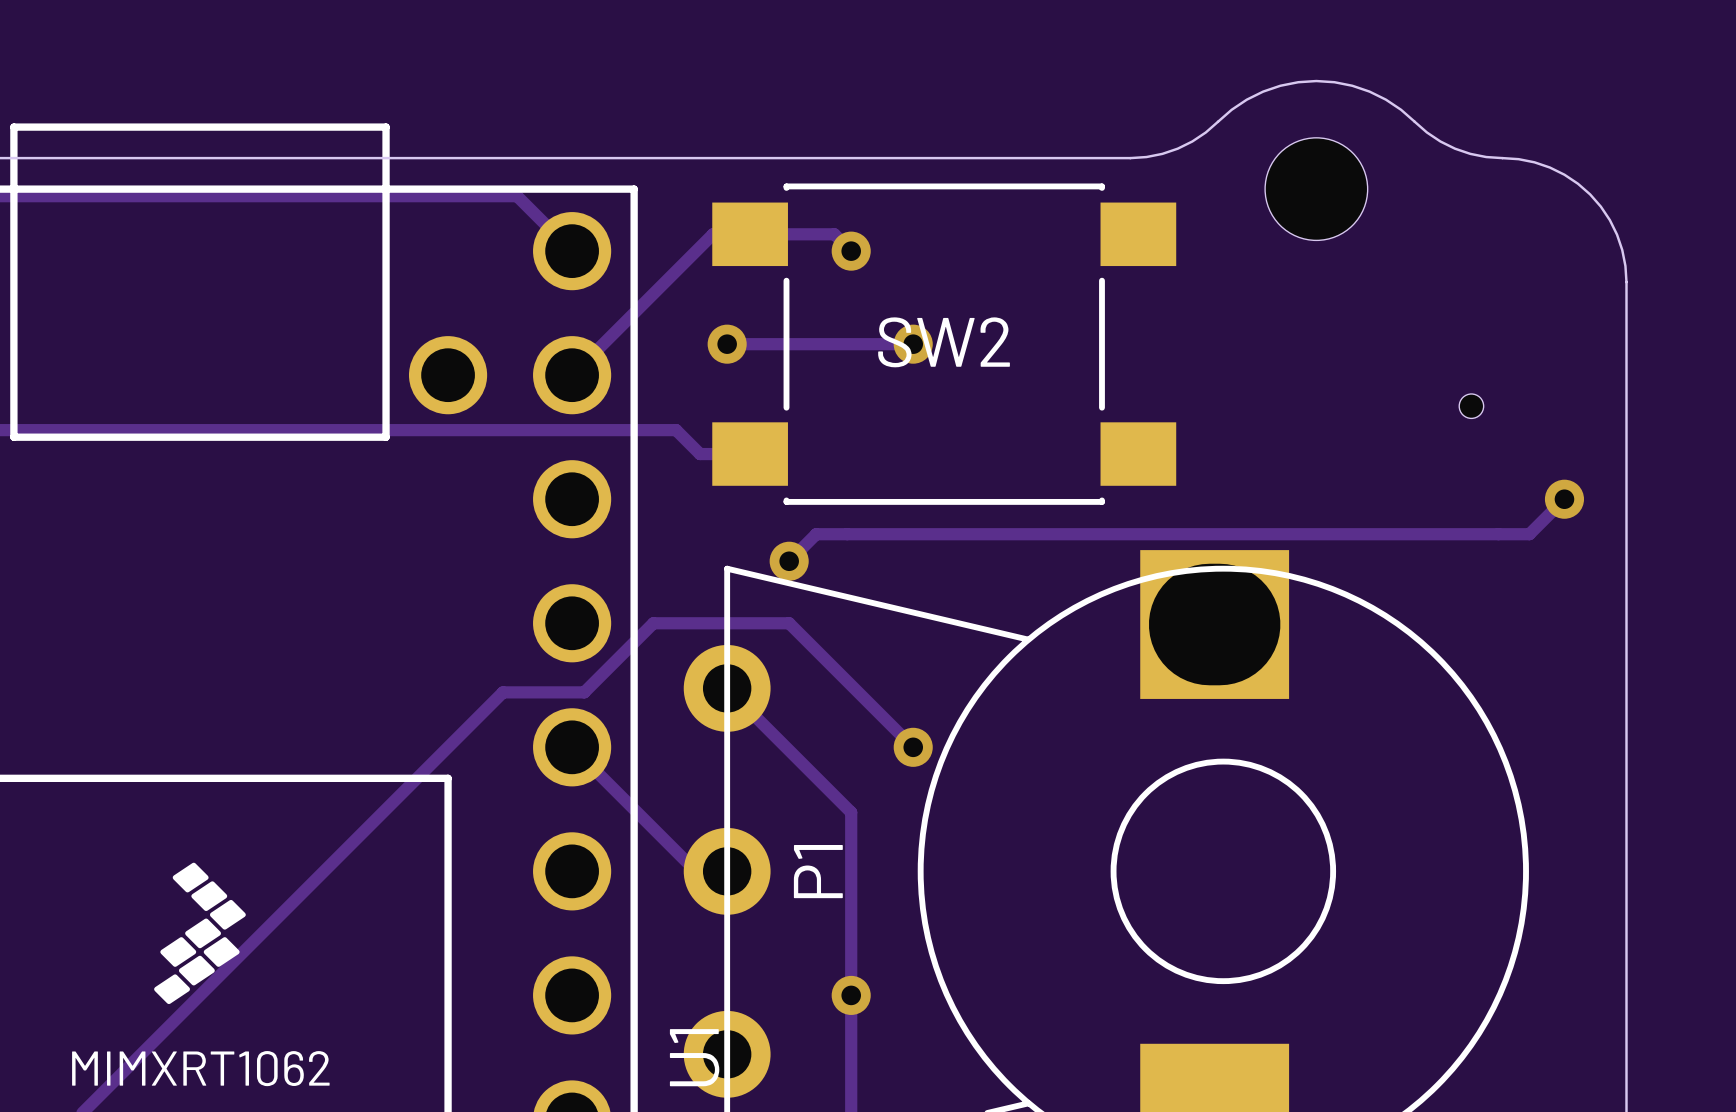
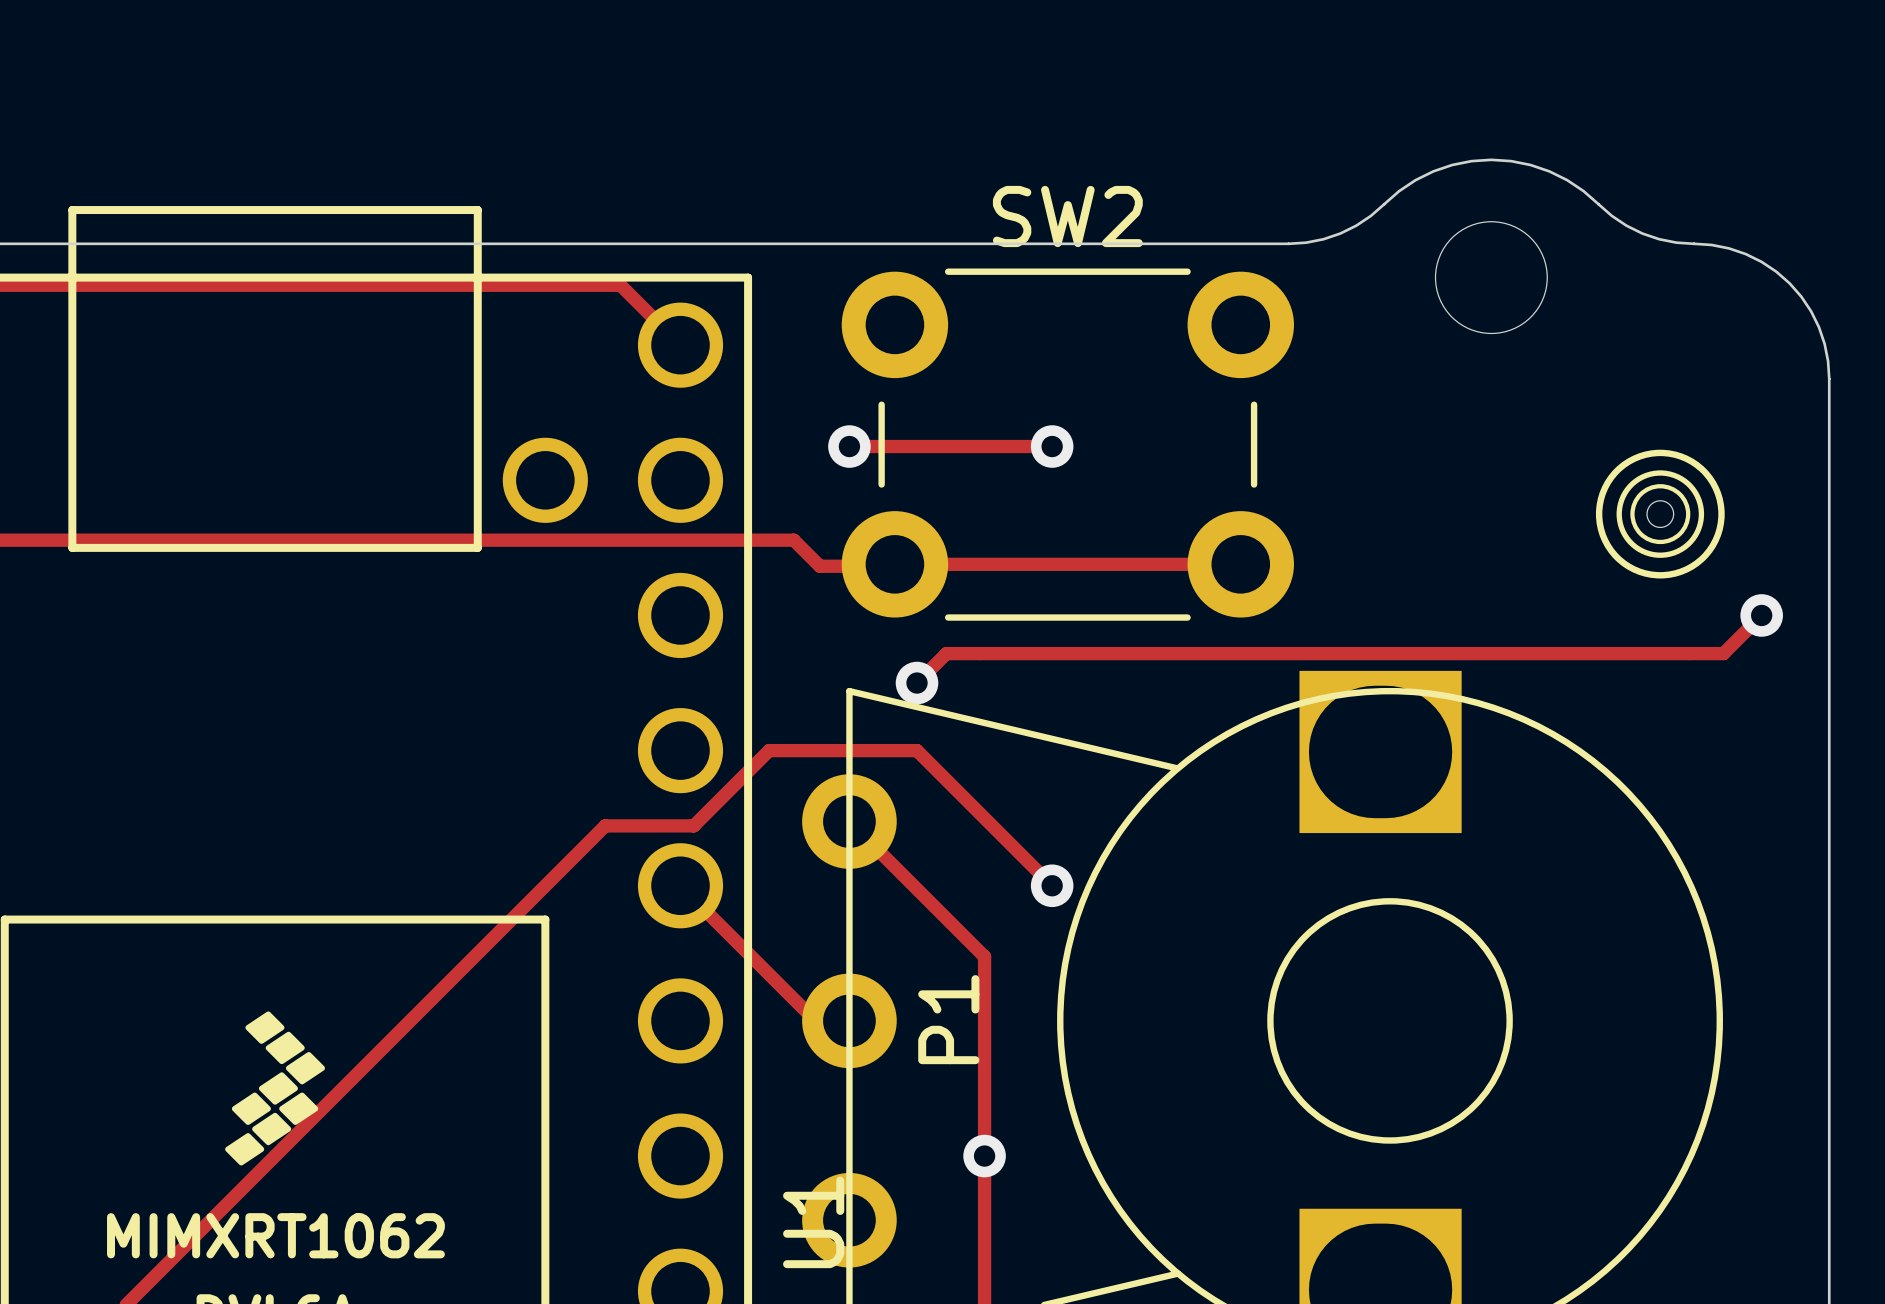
SW2 footprint: [712, 183, 1177, 505] -> [841, 268, 1294, 621]
track: (851, 251) (834, 234) (713, 234) (572, 375) -> none
via: (851, 251) -> none
SW2 name position: SW2 (944, 342) -> SW2 (1067, 216)
drawing: none -> [1595, 449, 1725, 579]
track: none -> (894, 564) (1240, 564)

